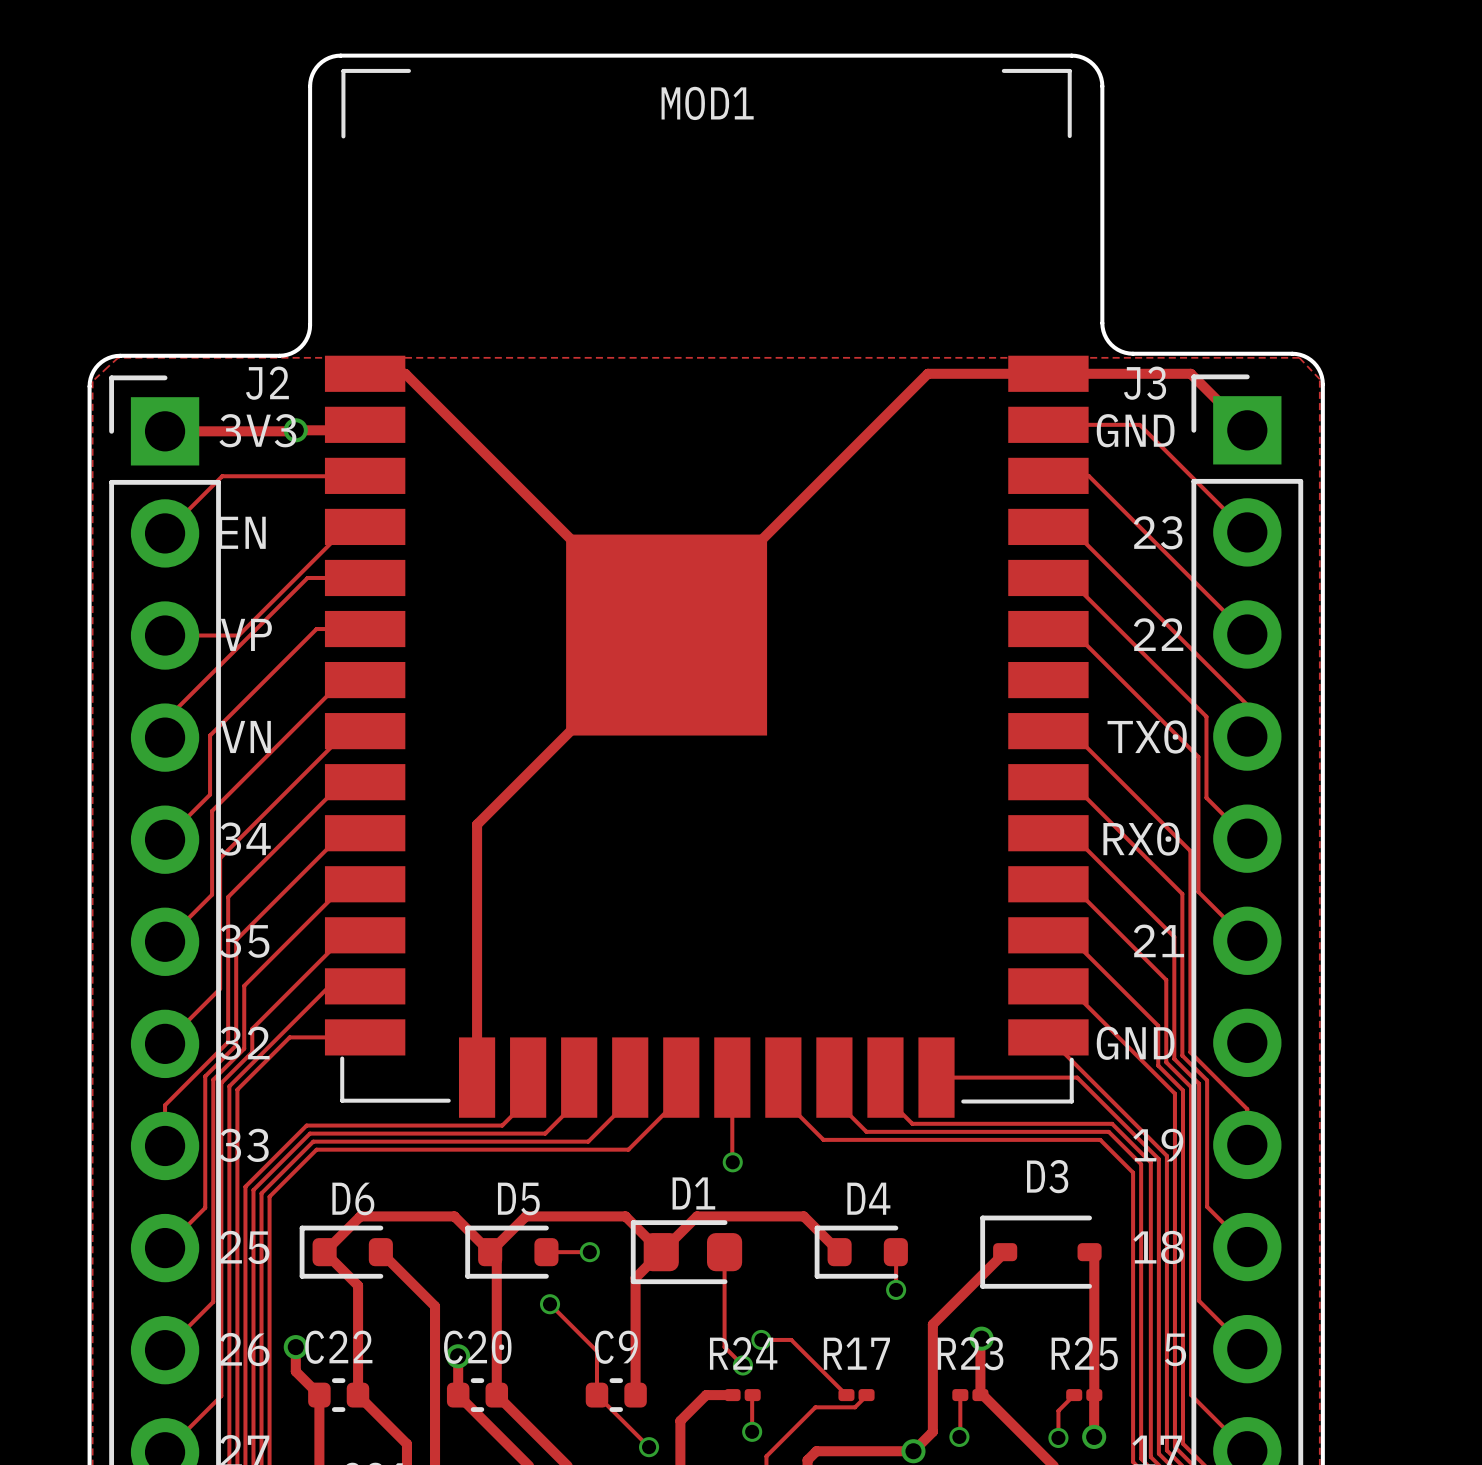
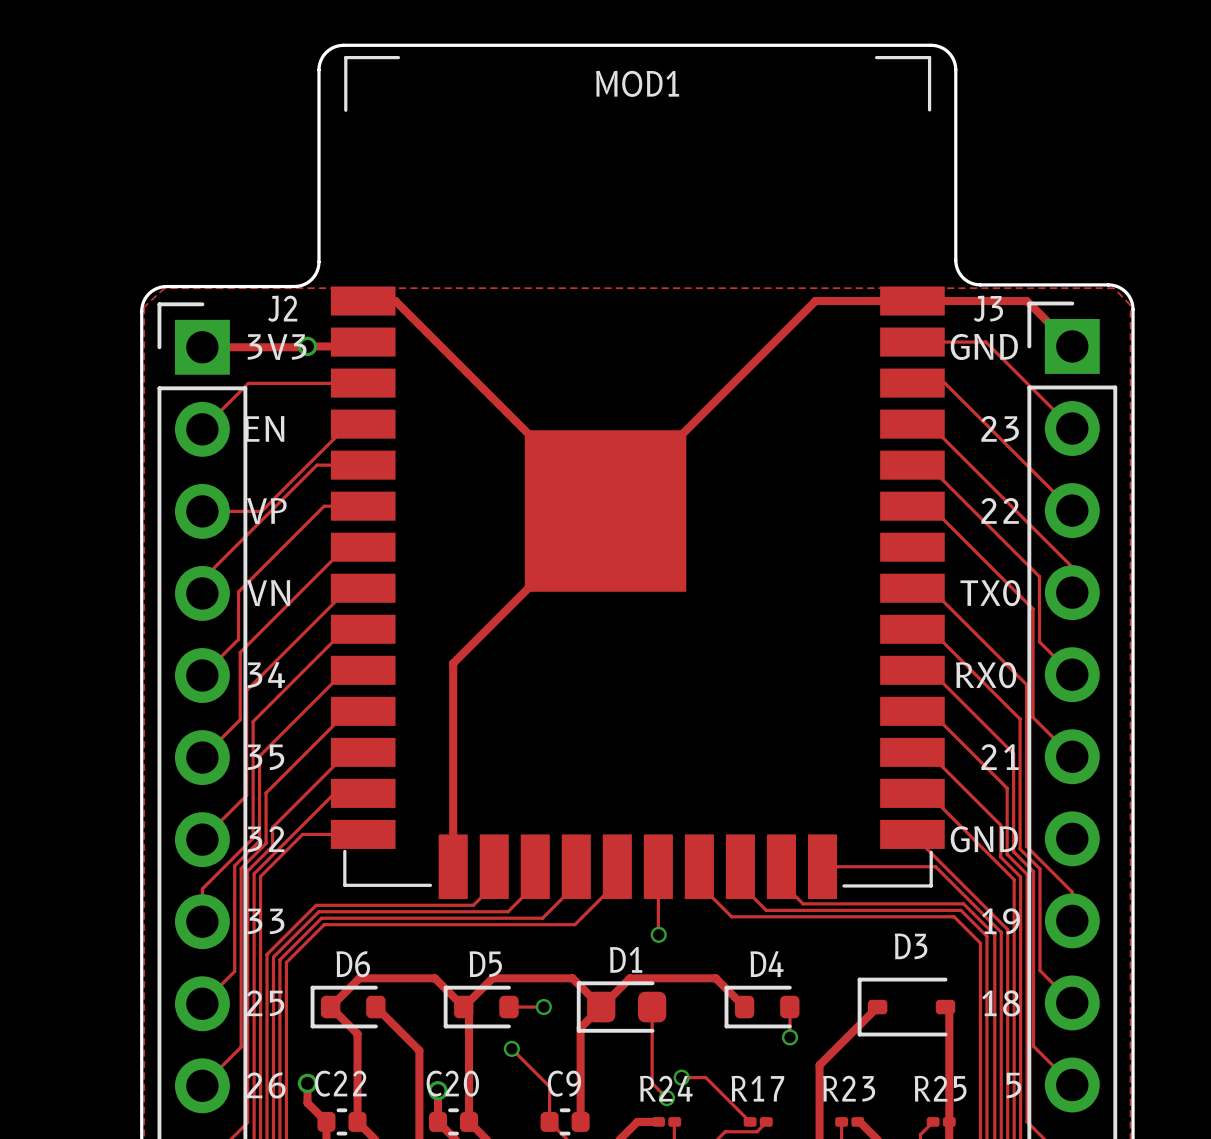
track: (981, 1338) (980, 1395) -> none
via: (981, 1338) -> none

